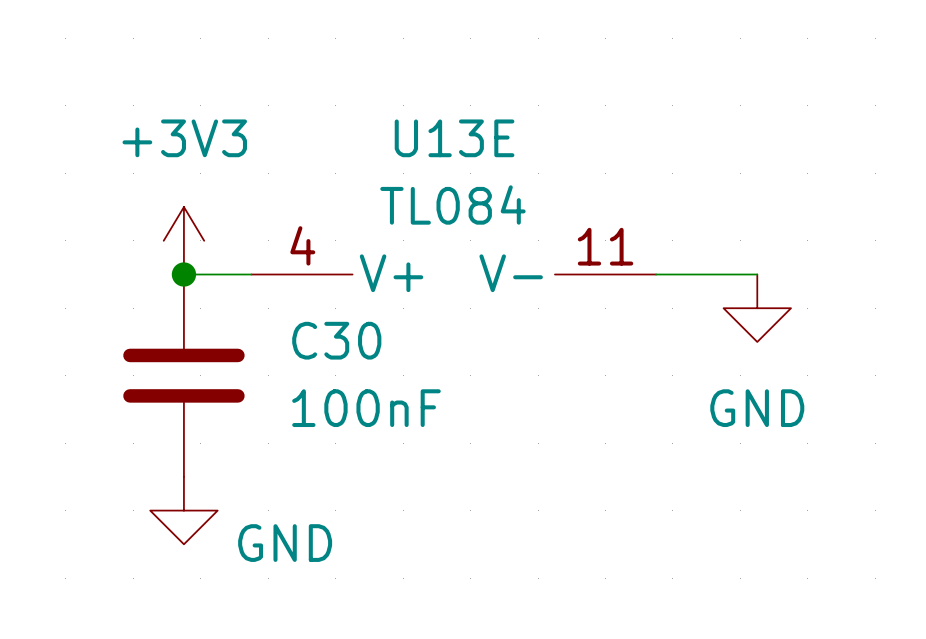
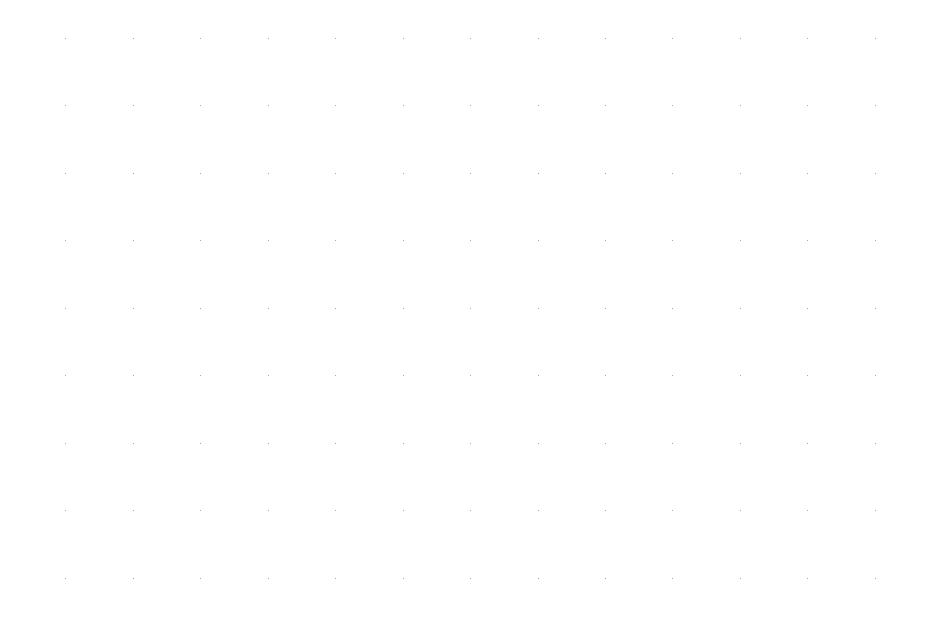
power symbol: +3V3 (183, 240) -> none
wire: (183, 274) (251, 274) -> none
junction: (183, 274) -> none
U13E: TL084 (453, 274) -> none
wire: (656, 274) (757, 274) -> none
power symbol: GND (757, 308) -> none
C30: 100nF (183, 375) -> none
power symbol: GND (183, 510) -> none

